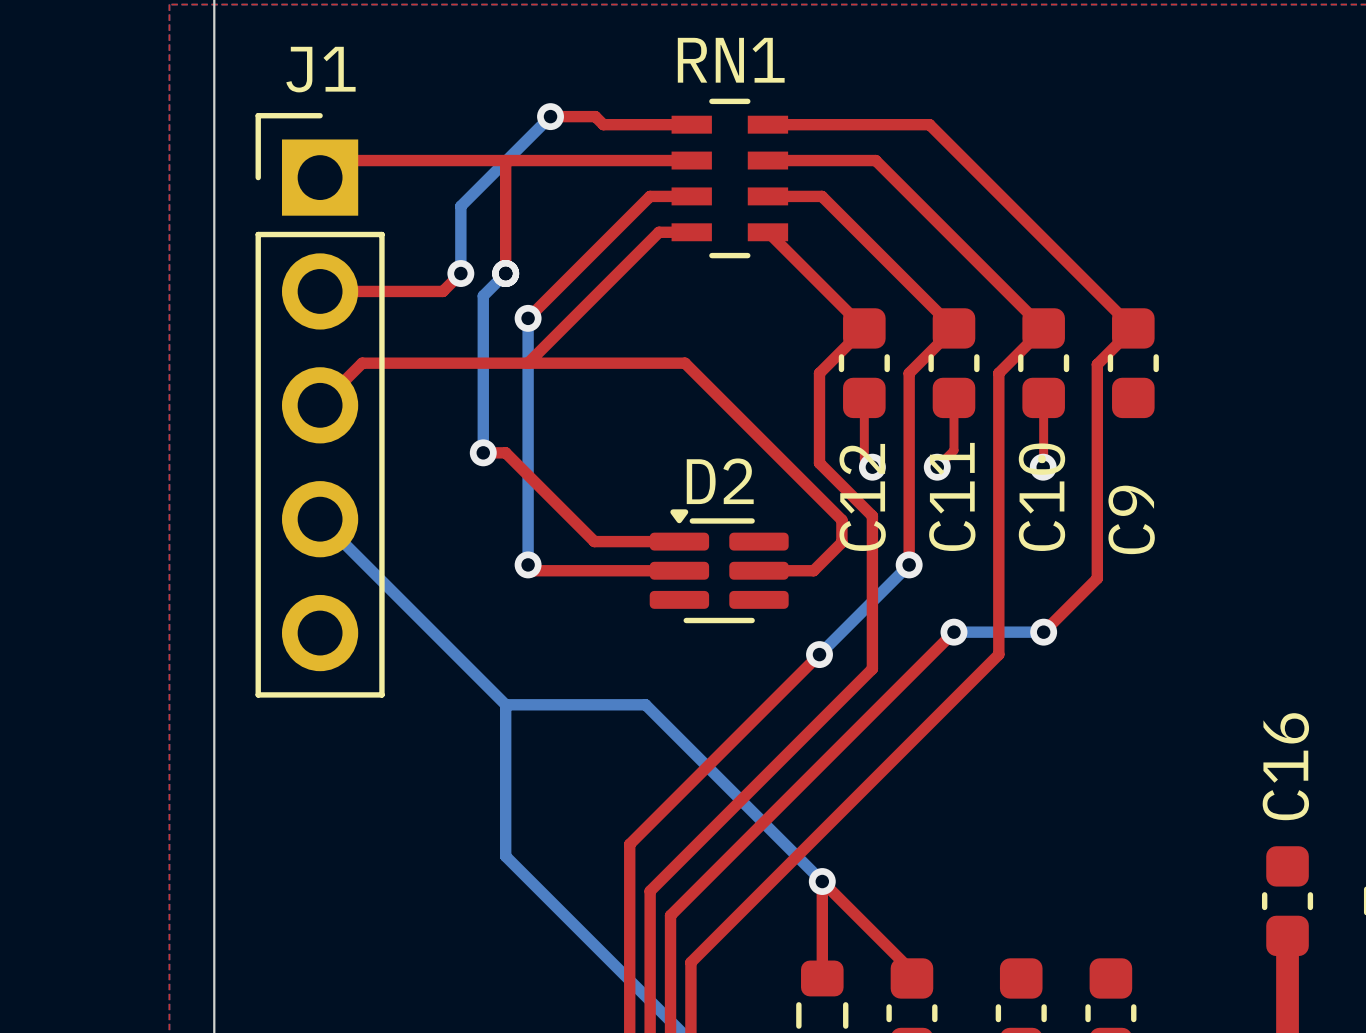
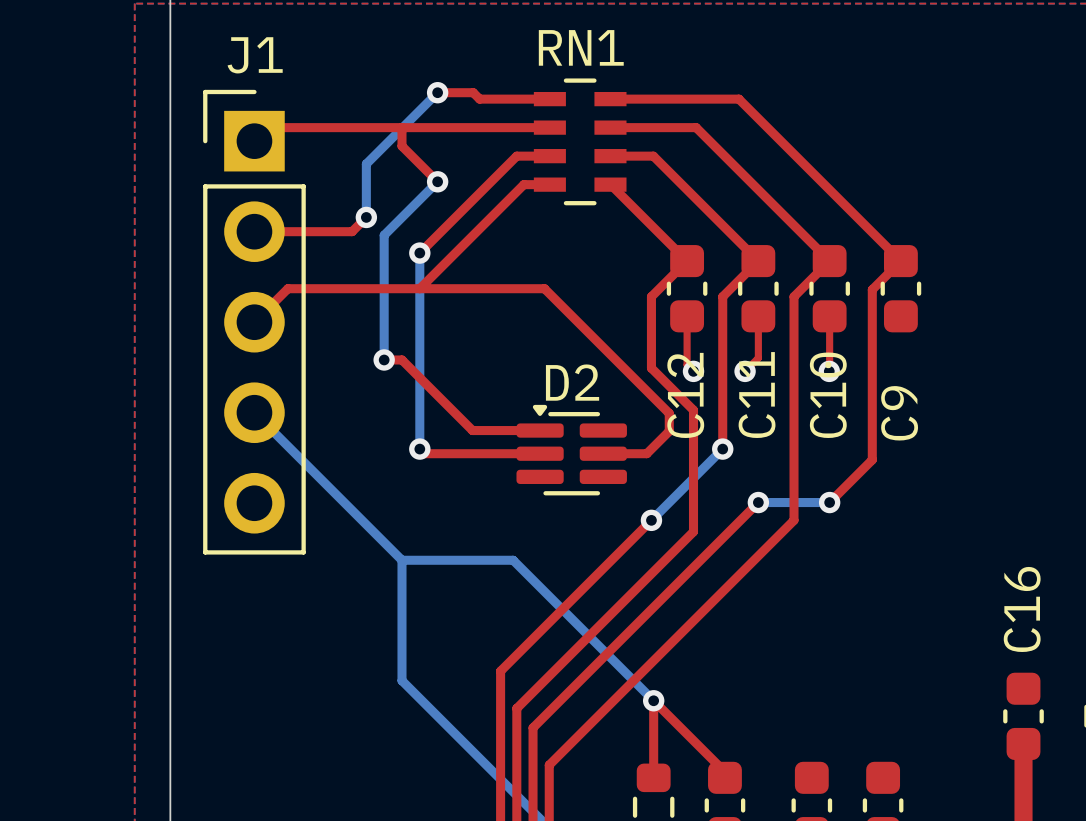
top track: (505, 183) (505, 273) -> (401, 146) (437, 181)
bottom track: none -> (437, 181) (401, 217)
via position: (505, 273) -> (437, 181)

